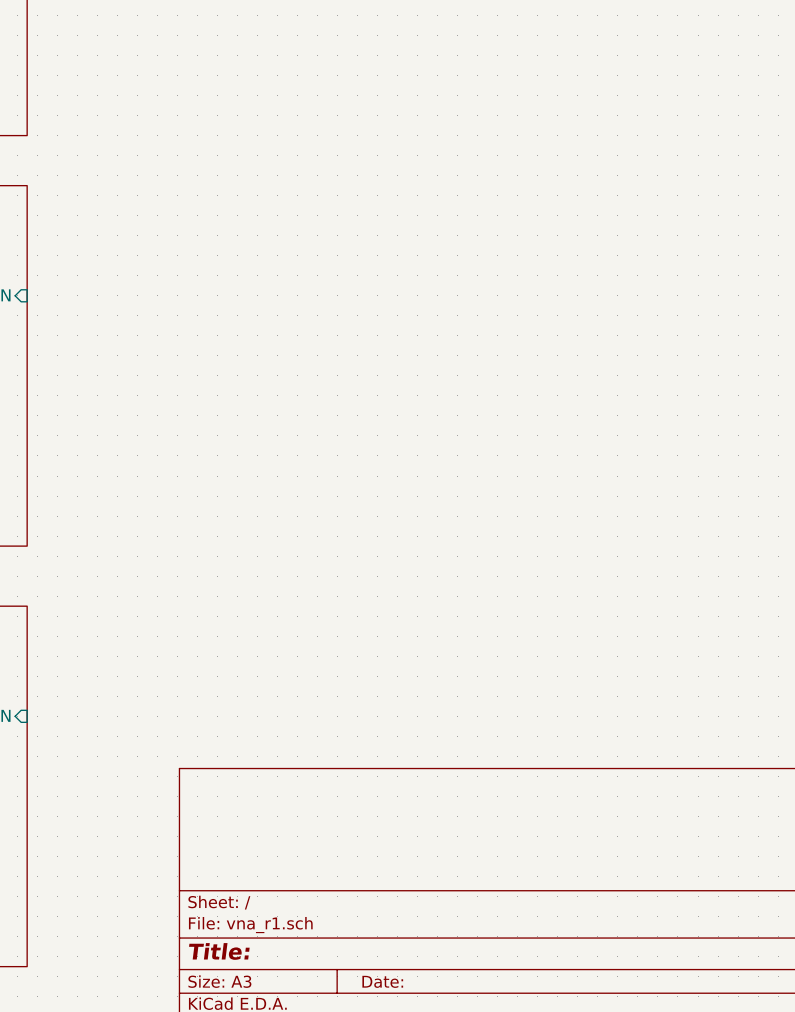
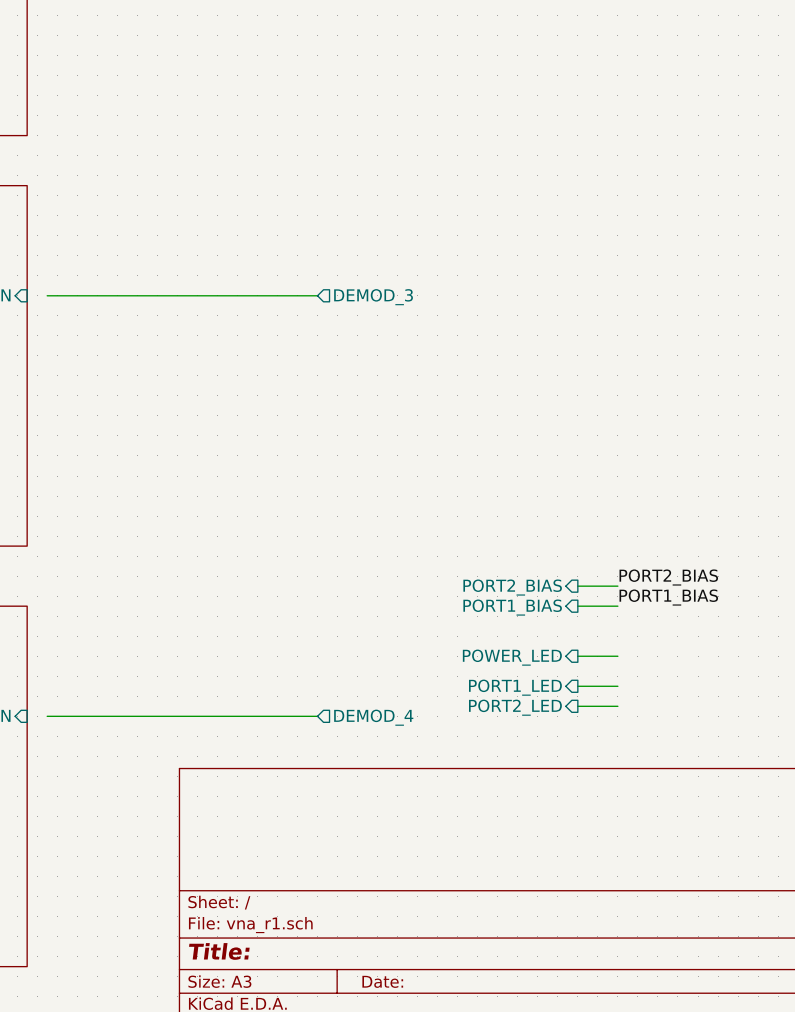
wire: none -> (47, 295) (317, 295)
sheet pin: none -> DEMOD_3 (373, 297)
label: none -> PORT2_BIAS (668, 577)
wire: none -> (577, 586) (617, 586)
sheet pin: none -> PORT2_BIAS (512, 587)
label: none -> PORT1_BIAS (668, 597)
wire: none -> (577, 606) (617, 606)
sheet pin: none -> PORT1_BIAS (512, 607)
wire: none -> (577, 656) (617, 656)
sheet pin: none -> POWER_LED (512, 657)
wire: none -> (577, 686) (617, 686)
sheet pin: none -> PORT1_LED (515, 687)
wire: none -> (577, 706) (617, 706)
sheet pin: none -> PORT2_LED (515, 707)
wire: none -> (47, 716) (317, 716)
sheet pin: none -> DEMOD_4 (373, 717)

